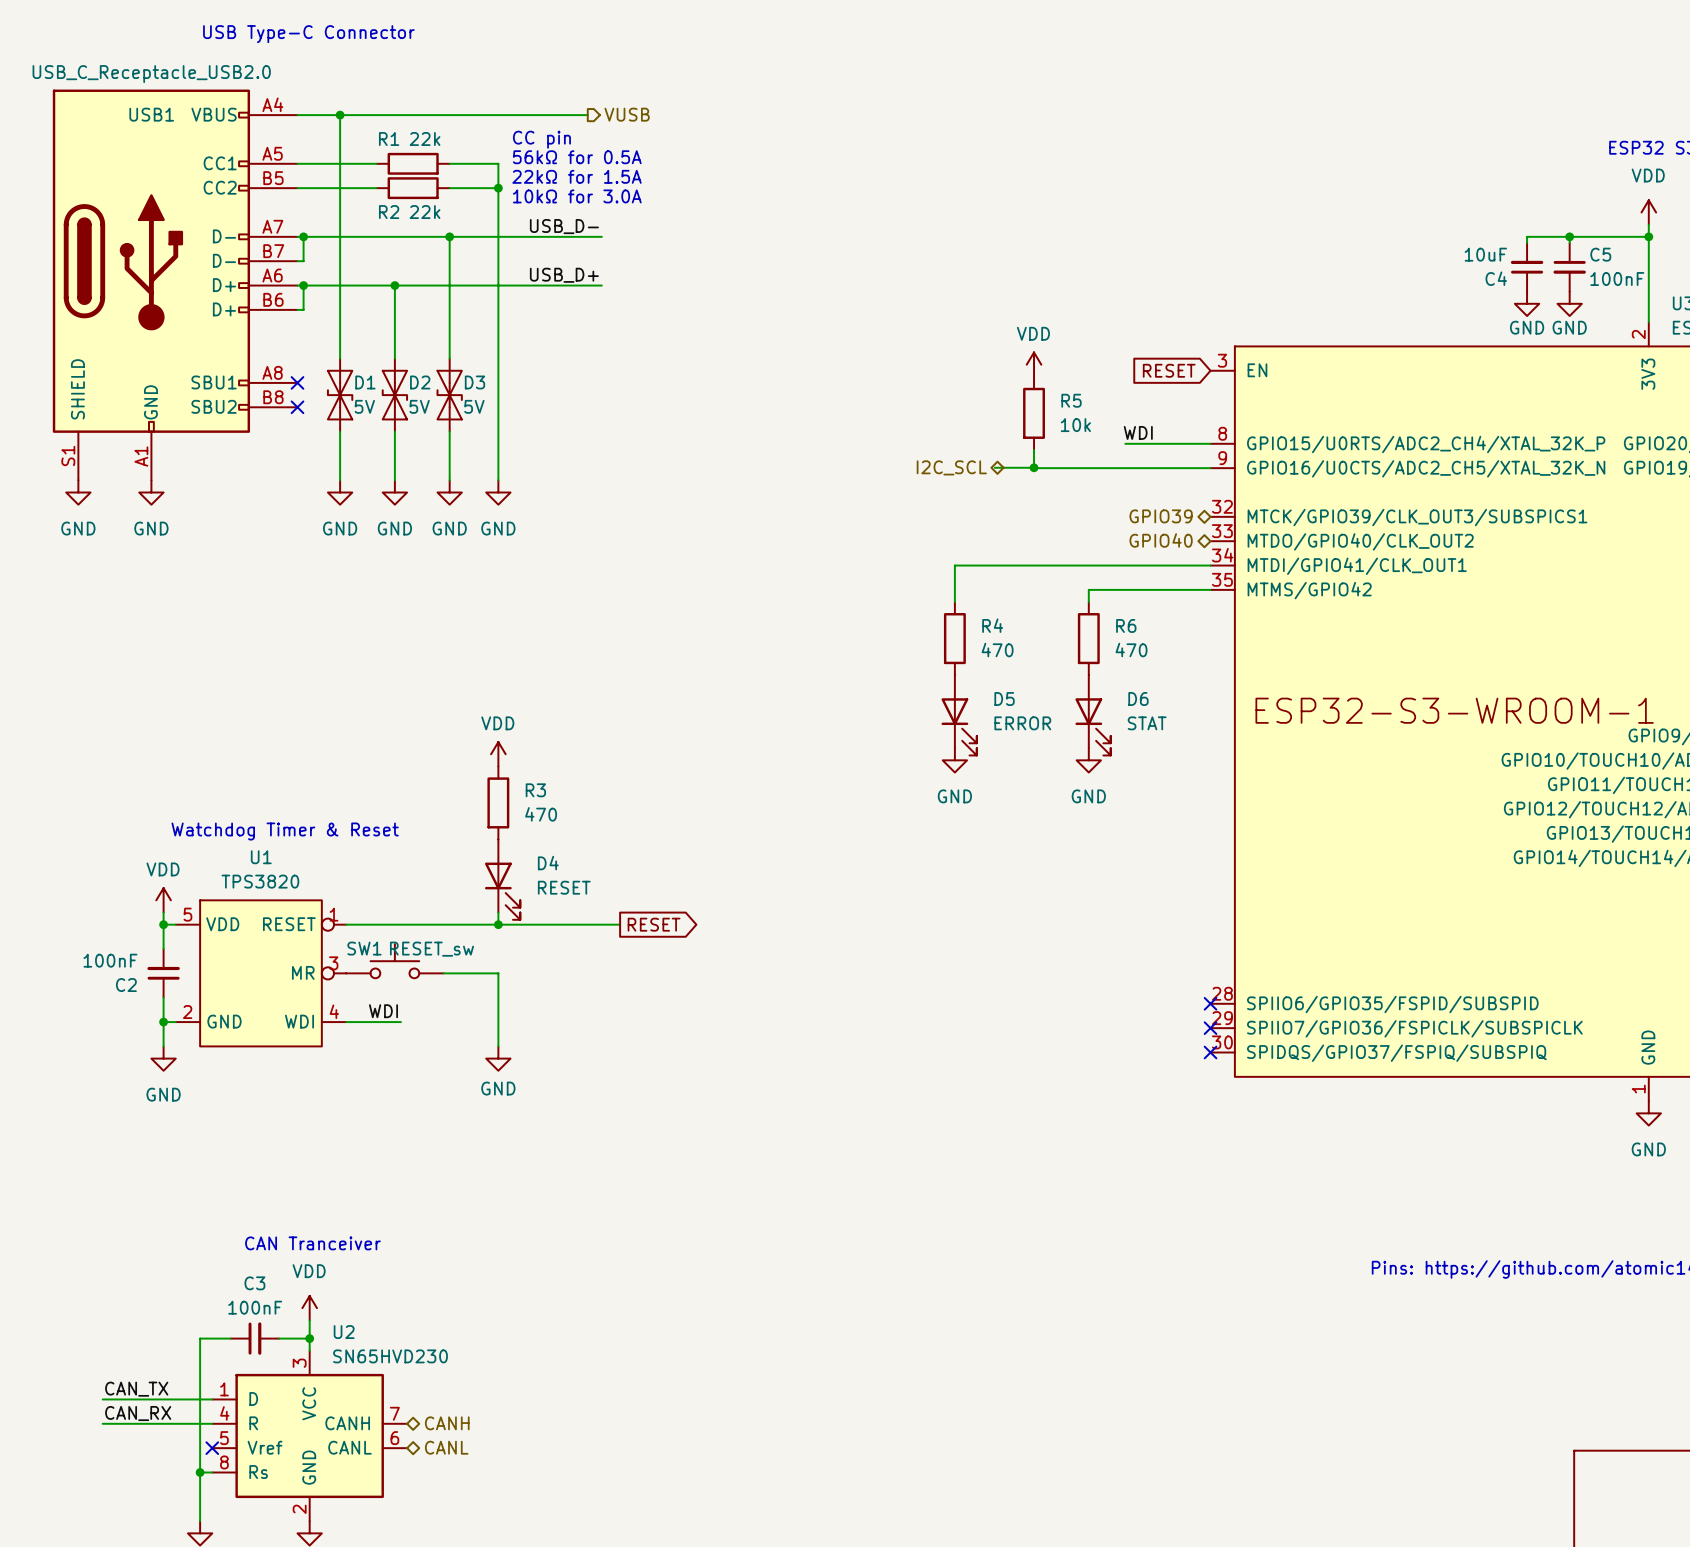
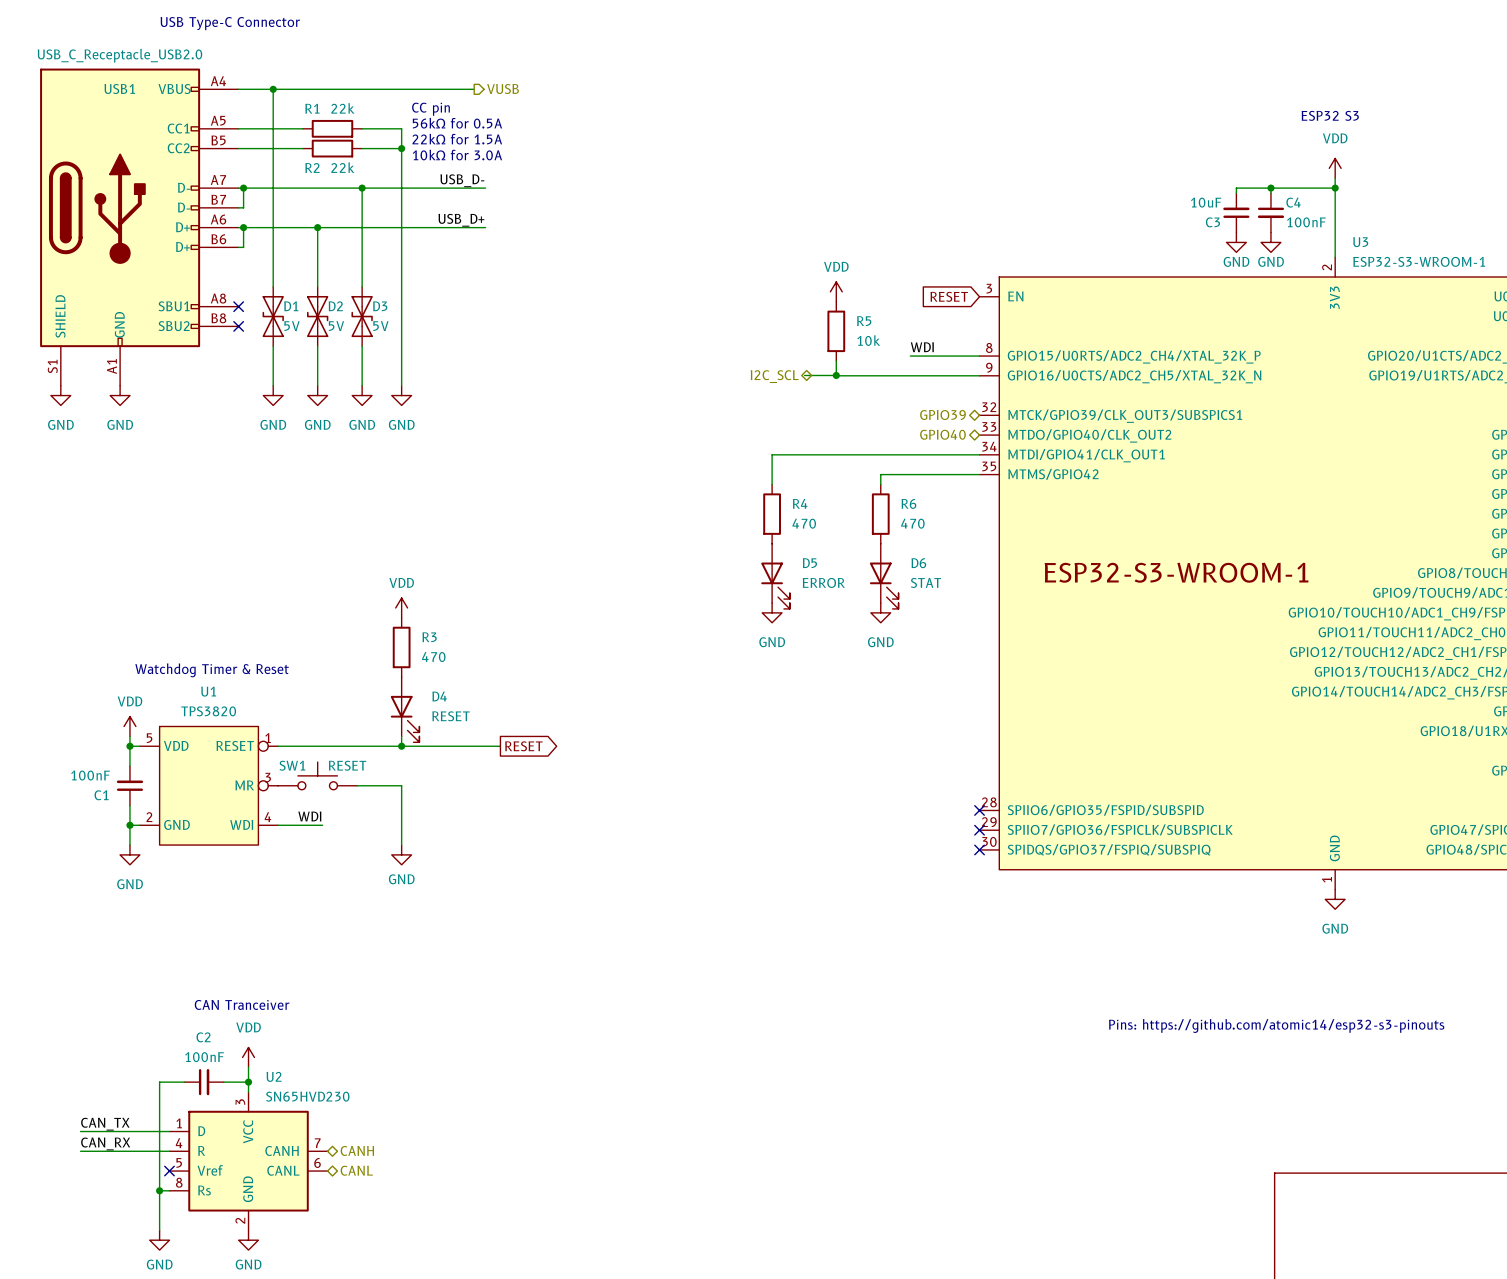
C5 name: C5 (1600, 254) -> C4 (1293, 202)
C4 name: C4 (1496, 278) -> C3 (1212, 222)
SW1 value: RESET_sw (431, 949) -> RESET (347, 765)
C2 name: C2 (126, 985) -> C1 (101, 795)
C3 name: C3 (254, 1283) -> C2 (203, 1037)

